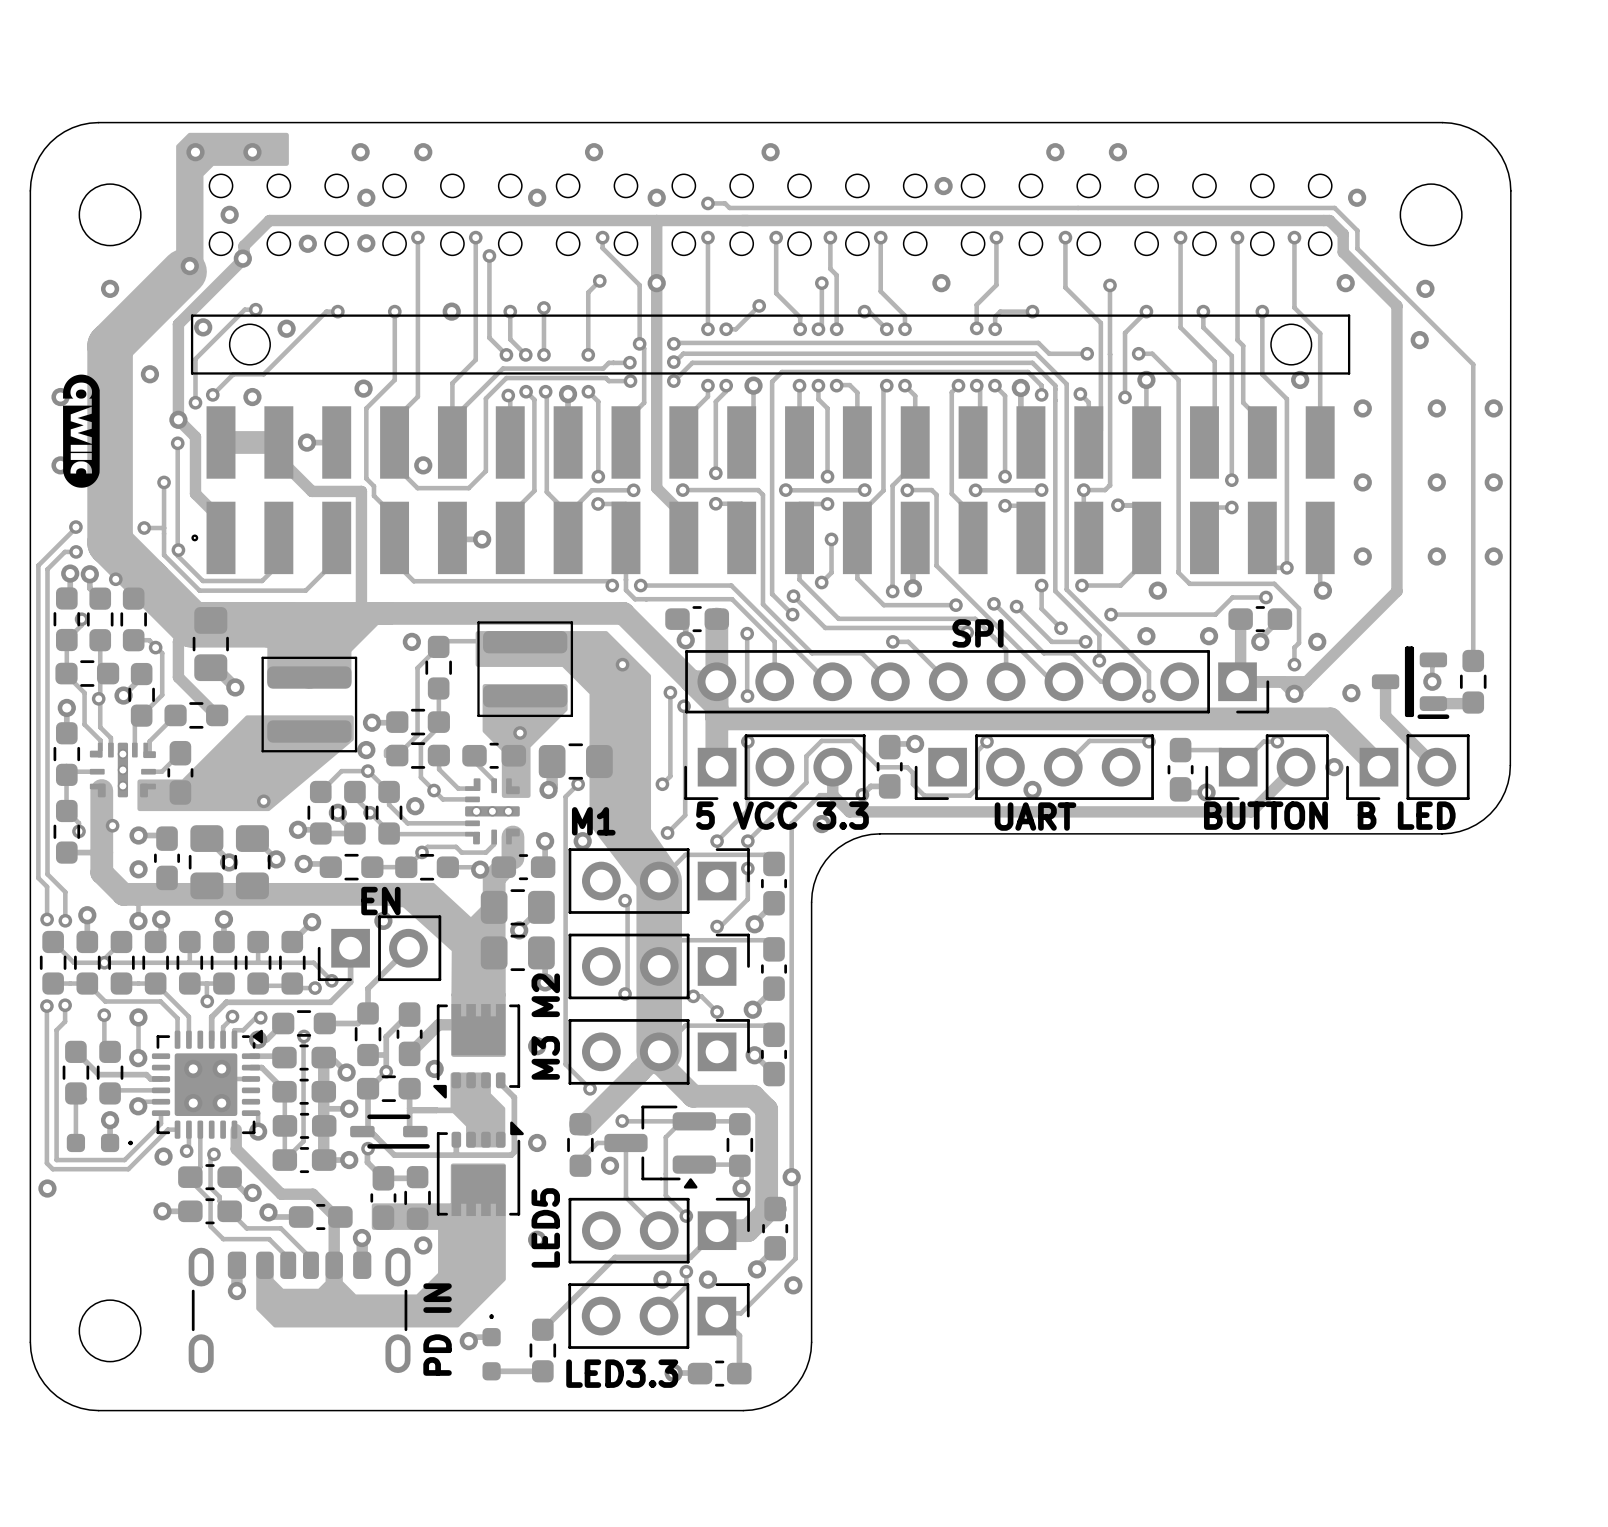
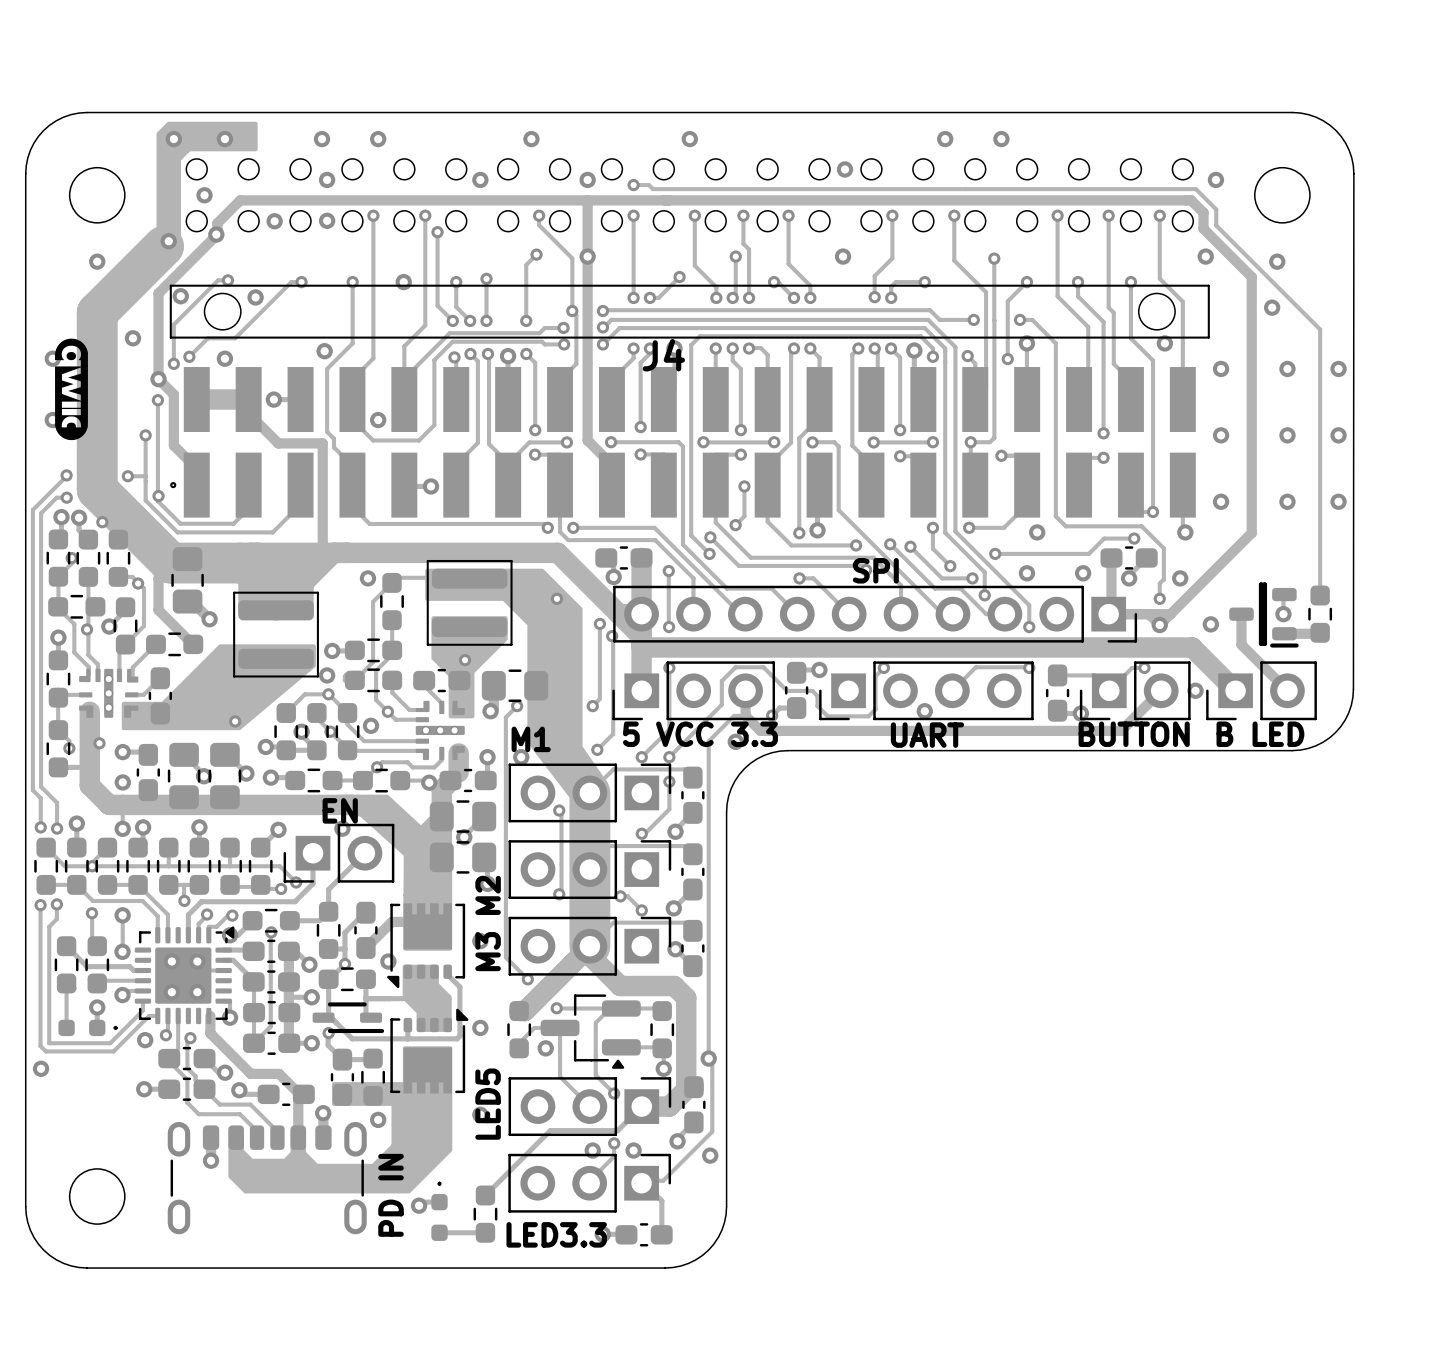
J4 name: none -> J4 (663, 355)

